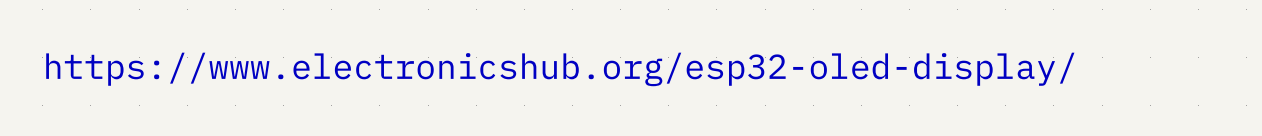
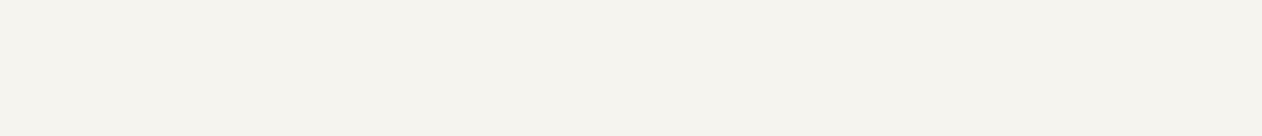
text: https://www.electronicshub.org/esp32-oled-display/ (560, 69) -> none

